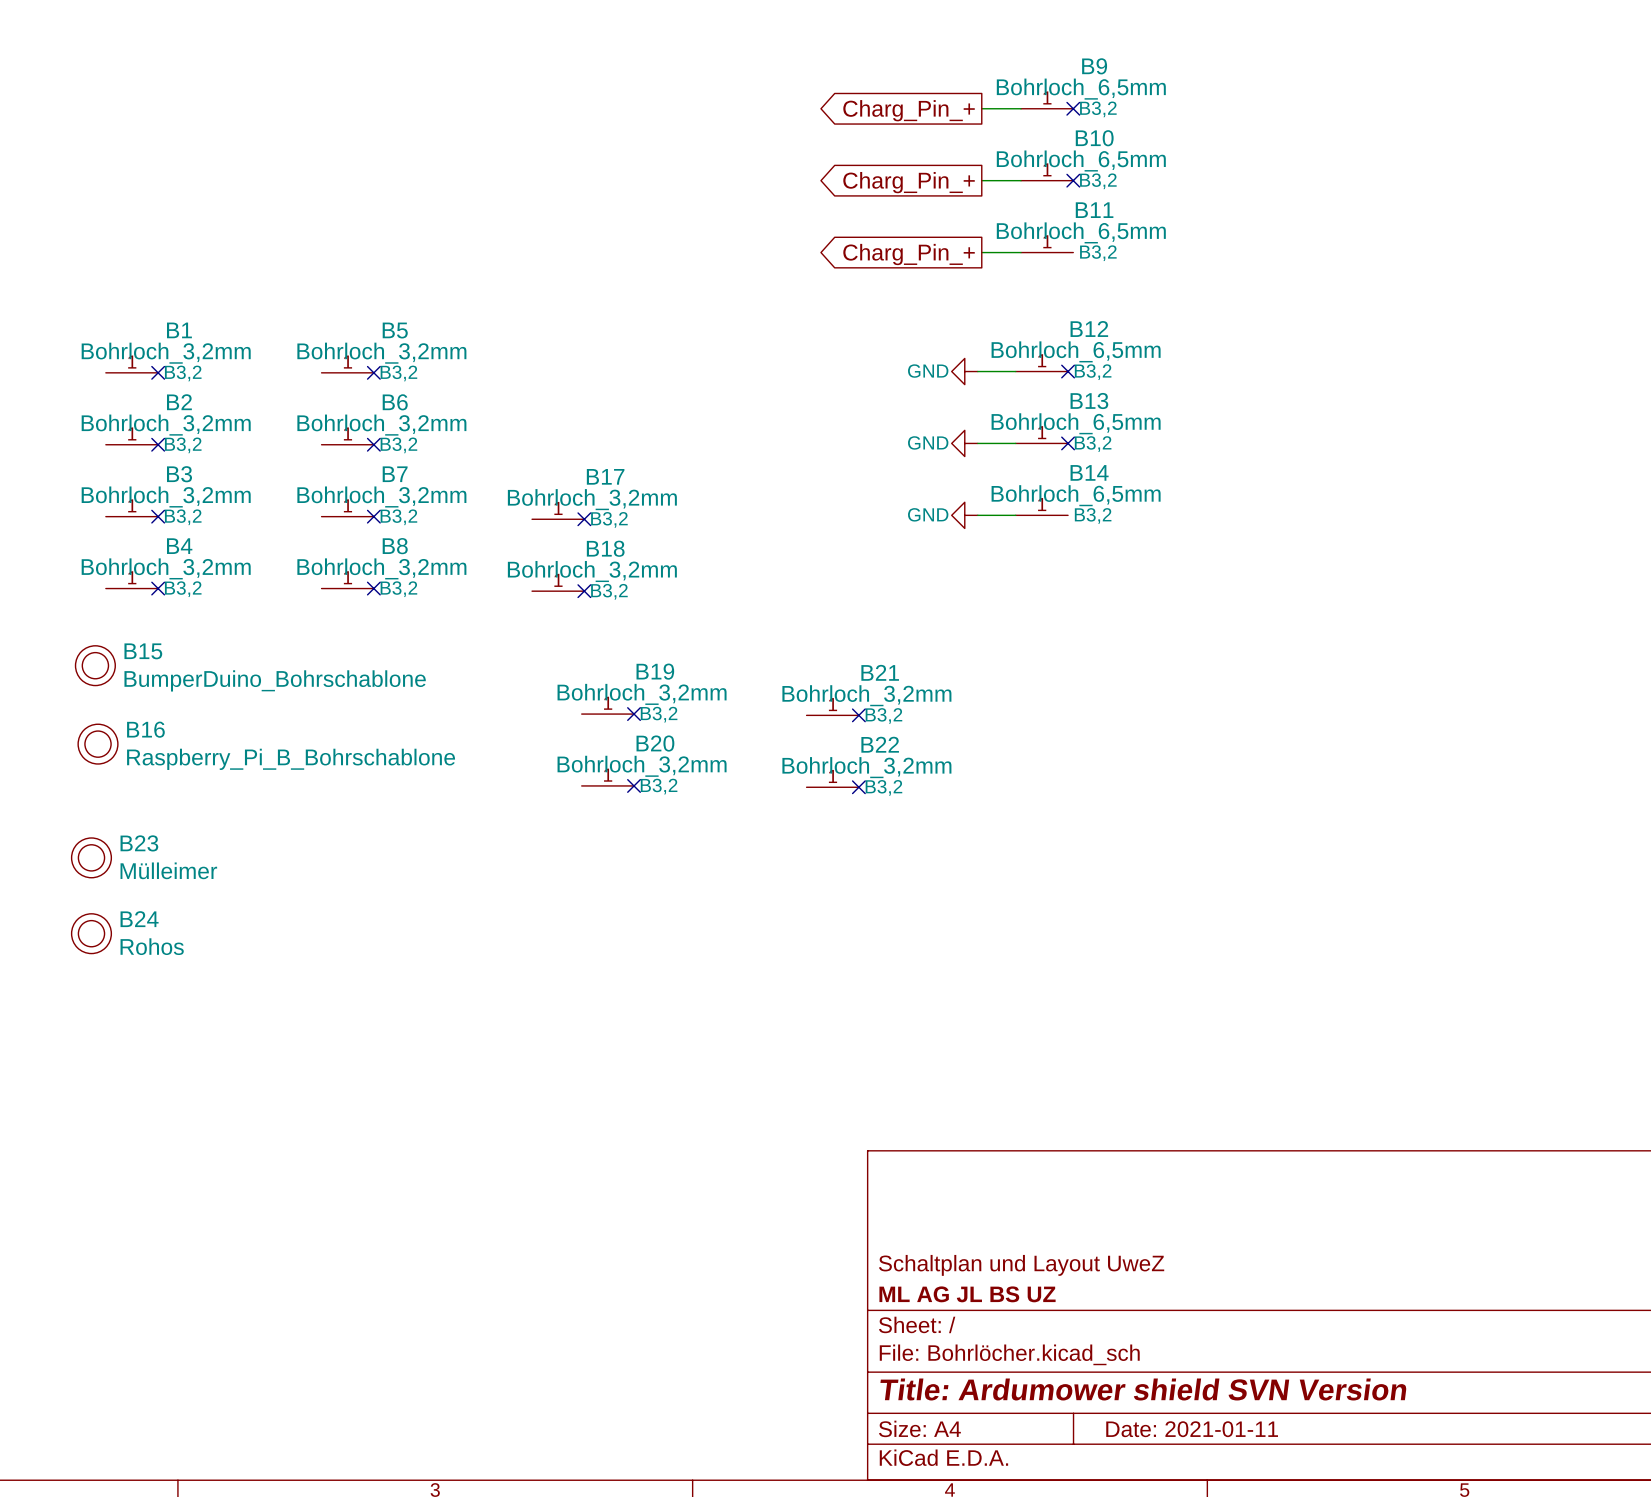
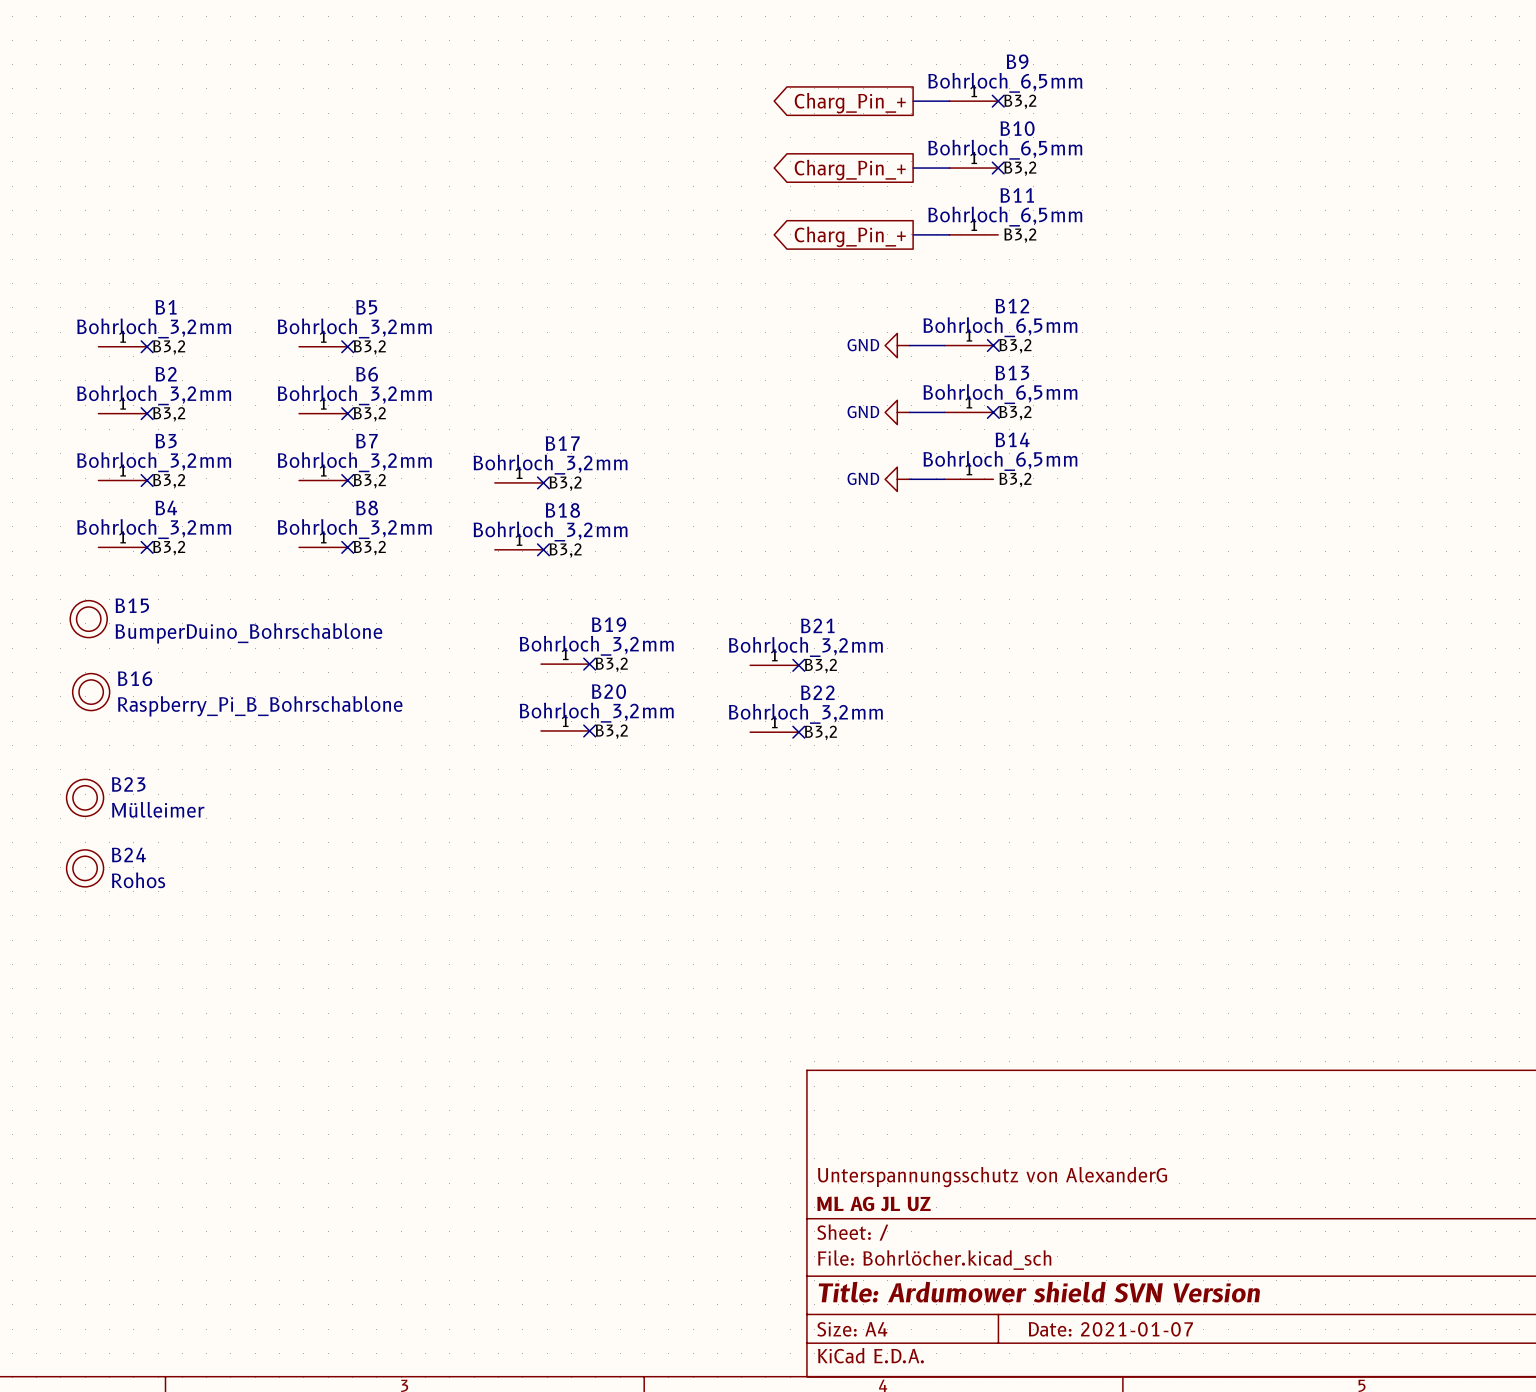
title block: Schaltplan und Layout UweZ (1021, 1265) -> Unterspannungsschutz von AlexanderG (992, 1177)
title block: ML AG JL BS UZ (967, 1294) -> ML AG JL UZ (873, 1203)
title block: Date: 2021-01-11 (1192, 1429) -> Date: 2021-01-07 (1110, 1329)

